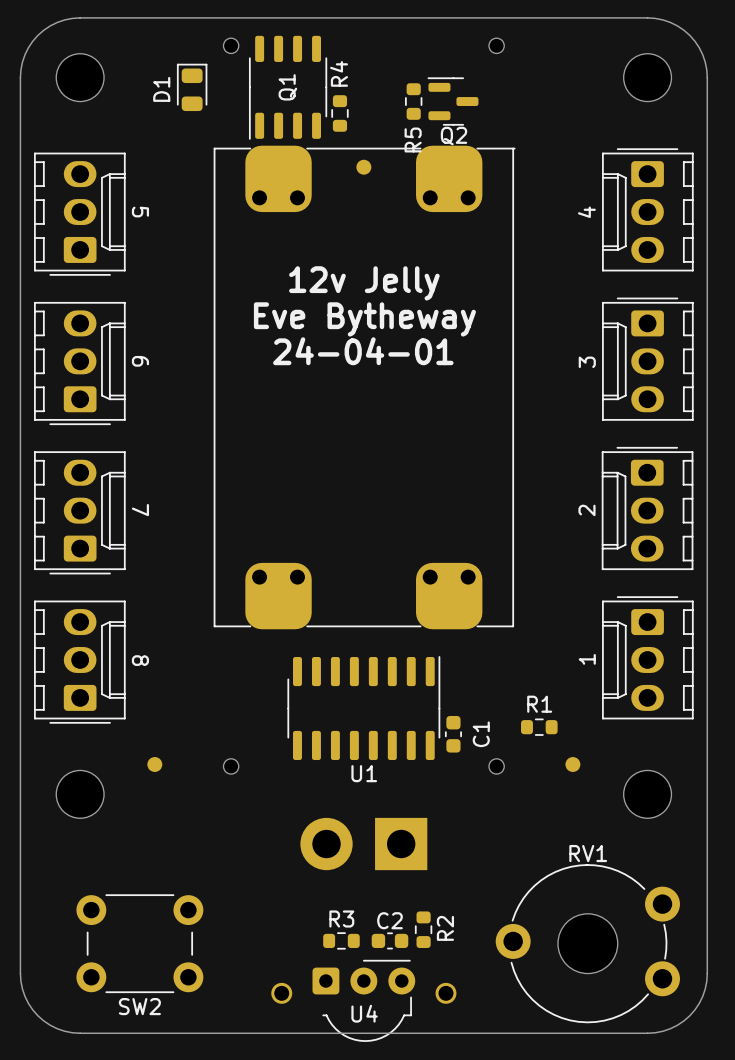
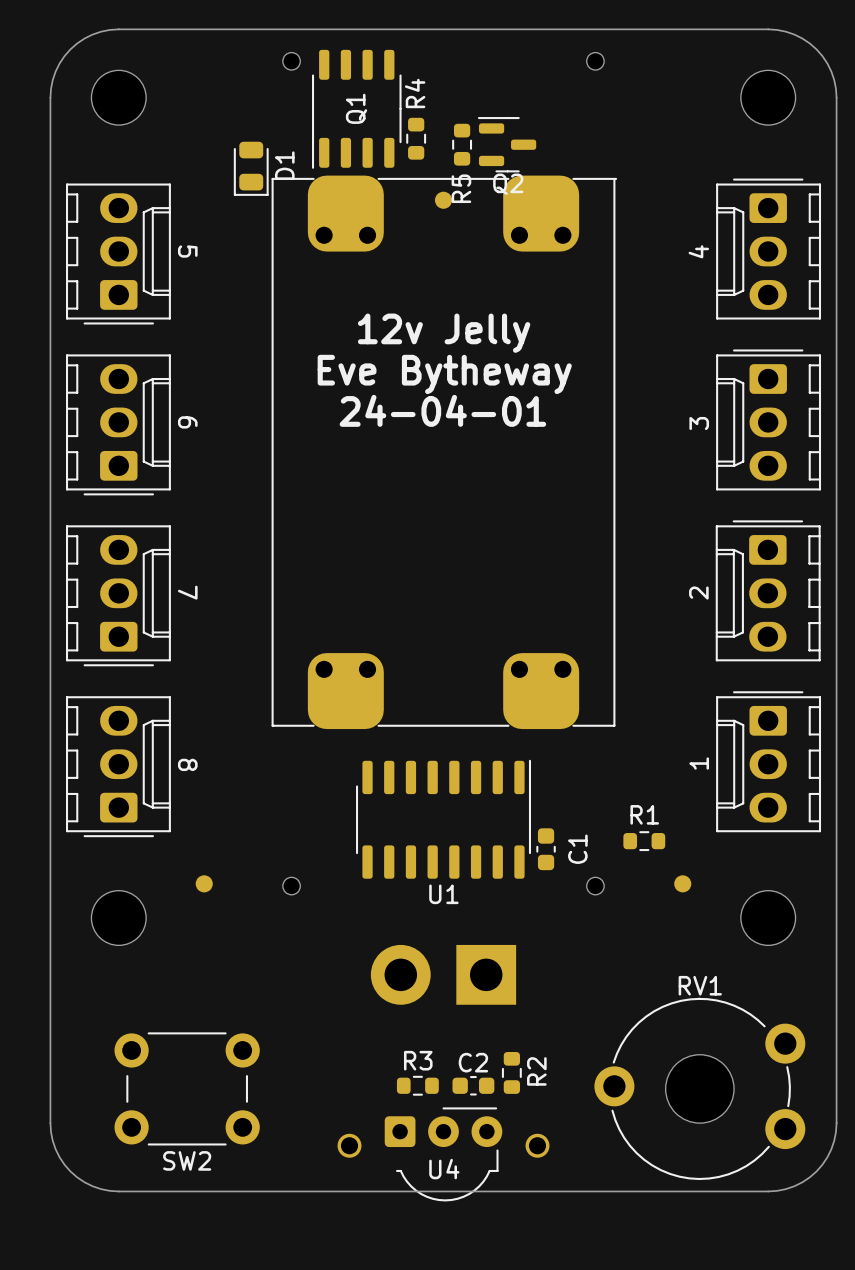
D1 rotation: 0° (192, 87) -> 180° (251, 168)
D1 position: (192, 87) -> (251, 168)
R5 position: (413, 101) -> (462, 144)
Q2 position: (453, 101) -> (507, 144)

